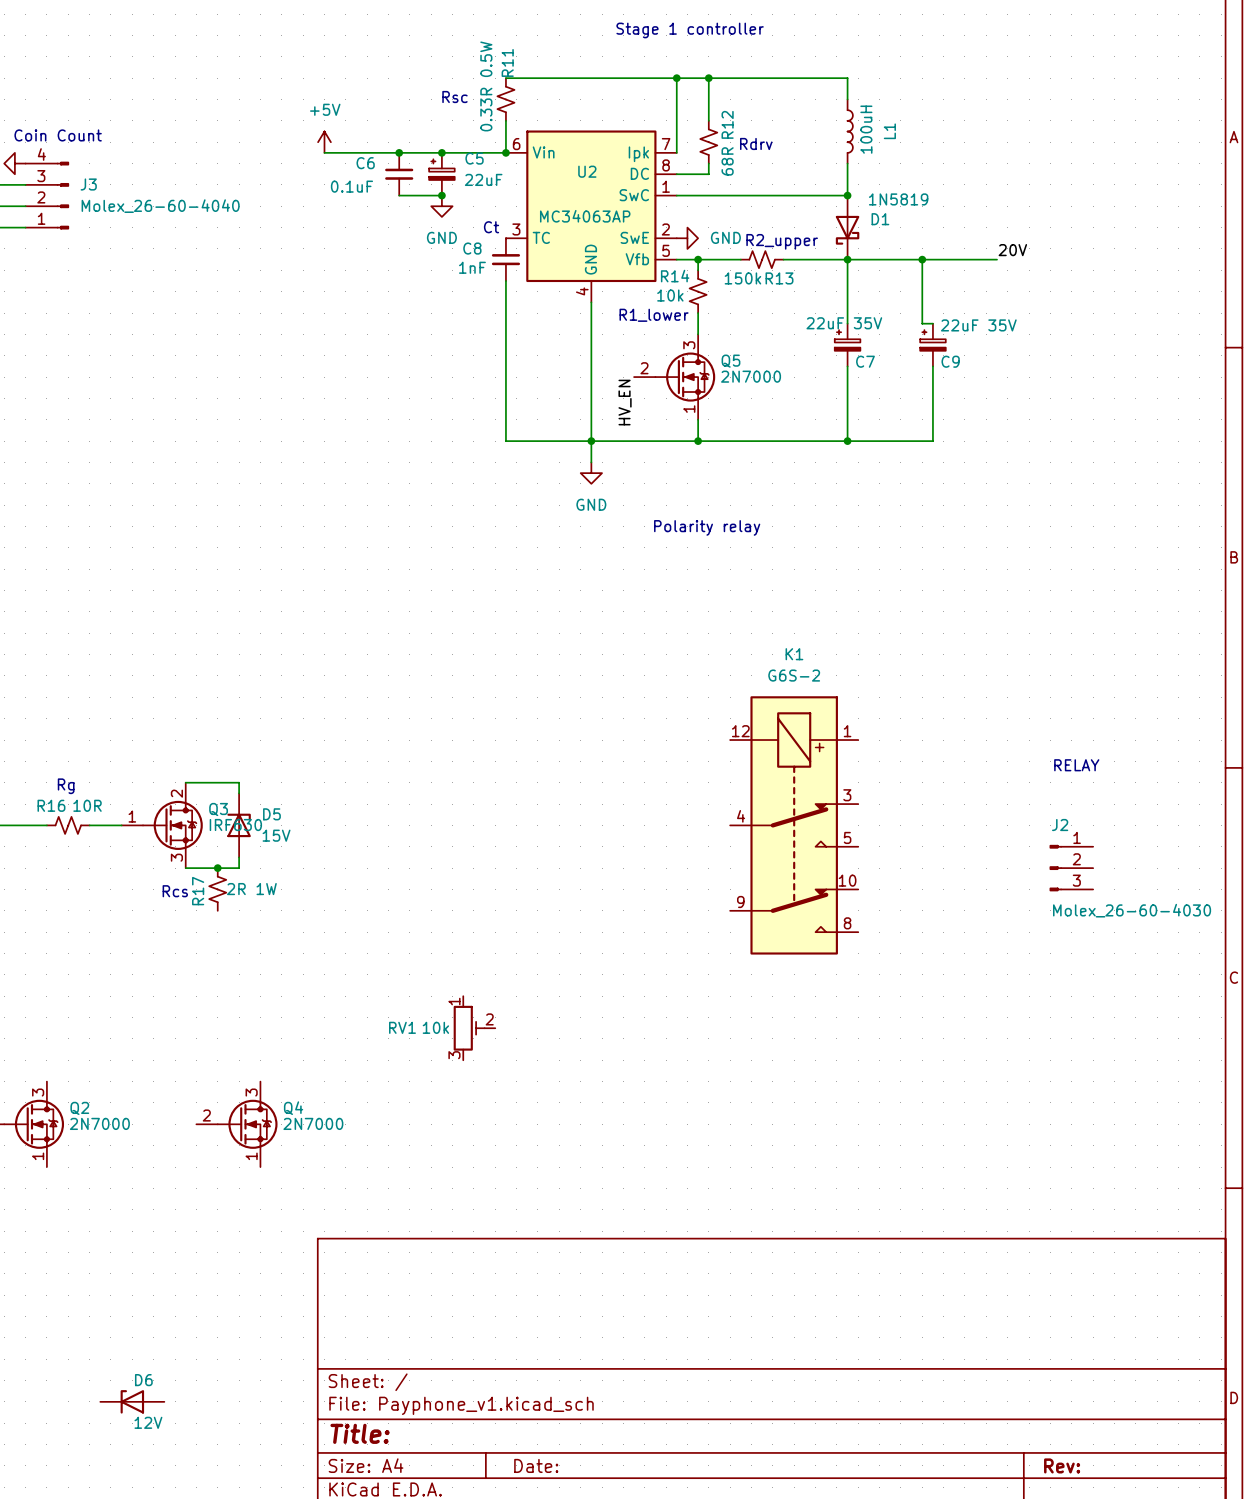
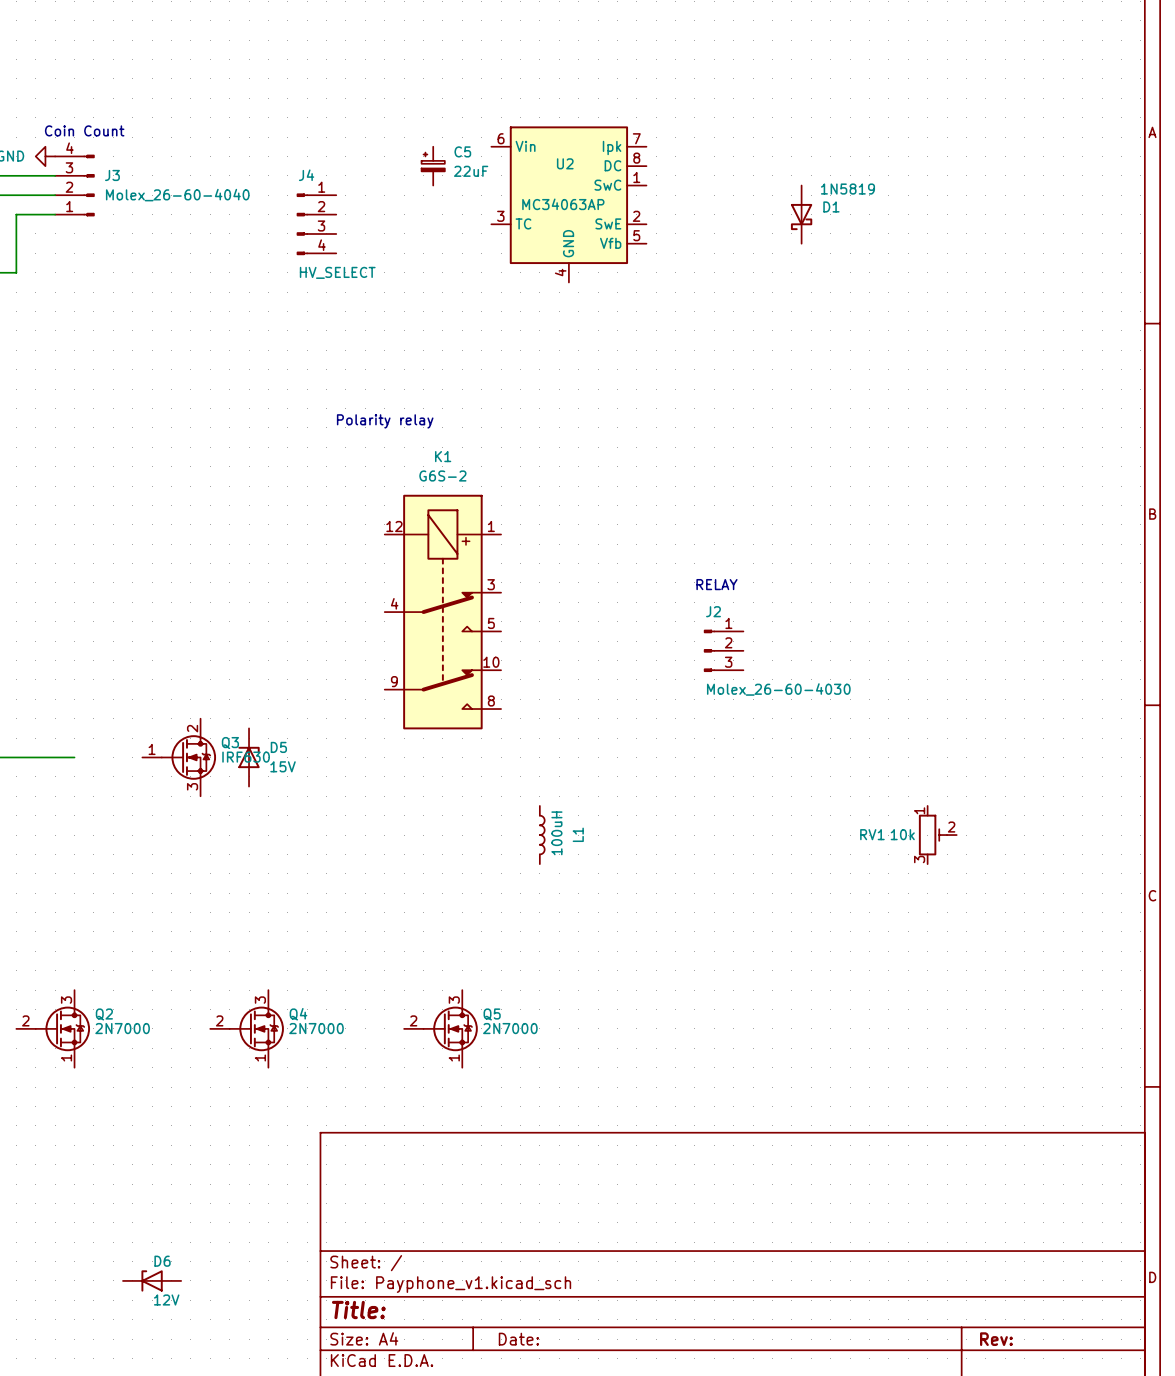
text: Stage 1 controller (690, 30) -> none
wire: (505, 78) (847, 78) (847, 99) -> none
wire: (676, 78) (676, 152) -> none
junction: (676, 78) -> none
wire: (708, 78) (708, 120) -> none
junction: (708, 78) -> none
text: Rsc (454, 97) -> none
R11: 0.33R 0.5W (505, 99) -> none
wire: (505, 120) (505, 152) (324, 152) -> none
L1 position: (850, 131) -> (542, 835)
power symbol: +5V (324, 142) -> none
R12: 68R (708, 142) -> none
text: Rdrv (756, 143) -> none
junction: (399, 152) -> none
junction: (441, 152) -> none
junction: (505, 152) -> none
wire: (708, 163) (708, 174) (676, 174) -> none
wire: (847, 163) (847, 195) (676, 195) -> none
C6: 0.1uF (399, 174) -> none
wire: (399, 195) (441, 195) -> none
junction: (441, 195) -> none
junction: (847, 195) -> none
power symbol: GND (441, 206) -> none
text: Ct (491, 227) -> none
J4: none -> HV_SELECT (316, 224)
power symbol: GND (687, 238) -> none
text: R2_upper (782, 241) -> none
label: 20V (1012, 250) -> none
C8: 1nF (505, 259) -> none
wire: (676, 259) (740, 259) -> none
wire: (698, 259) (698, 270) -> none
junction: (698, 259) -> none
R13: 150k (762, 259) -> none
wire: (783, 259) (997, 259) -> none
wire: (847, 259) (847, 323) -> none
junction: (847, 259) -> none
wire: (922, 259) (922, 323) (932, 323) -> none
junction: (922, 259) -> none
wire: (505, 280) (505, 441) (932, 441) (932, 366) -> none
R14: 10k (698, 291) -> none
wire: (591, 302) (591, 462) -> none
wire: (698, 313) (698, 334) -> none
text: R1_lower (654, 315) -> none
C7: 22uF 35V (847, 345) -> none
C9: 22uF 35V (932, 345) -> none
wire: (847, 366) (847, 441) -> none
Q5 position: (674, 377) -> (440, 1028)
label: HV_EN (625, 402) -> none
wire: (698, 419) (698, 441) -> none
junction: (591, 441) -> none
junction: (698, 441) -> none
junction: (847, 441) -> none
text: none -> Polarity relay (385, 421)
power symbol: GND (591, 473) -> none
text: Polarity relay (707, 527) -> none
text: none -> RELAY (716, 584)
text: RELAY (1076, 765) -> none
wire: (185, 782) (239, 782) (239, 793) -> none
text: Rg (66, 786) -> none
R16: 10R (68, 825) -> none
wire: (89, 825) (121, 825) -> none
K1 position: (794, 825) -> (442, 612)
wire: (239, 857) (239, 868) (185, 868) -> none
junction: (217, 868) -> none
J2 position: (1071, 868) -> (723, 650)
R17: 2R 1W (217, 889) -> none
text: Rcs (175, 891) -> none
RV1 position: (474, 1028) -> (937, 835)

